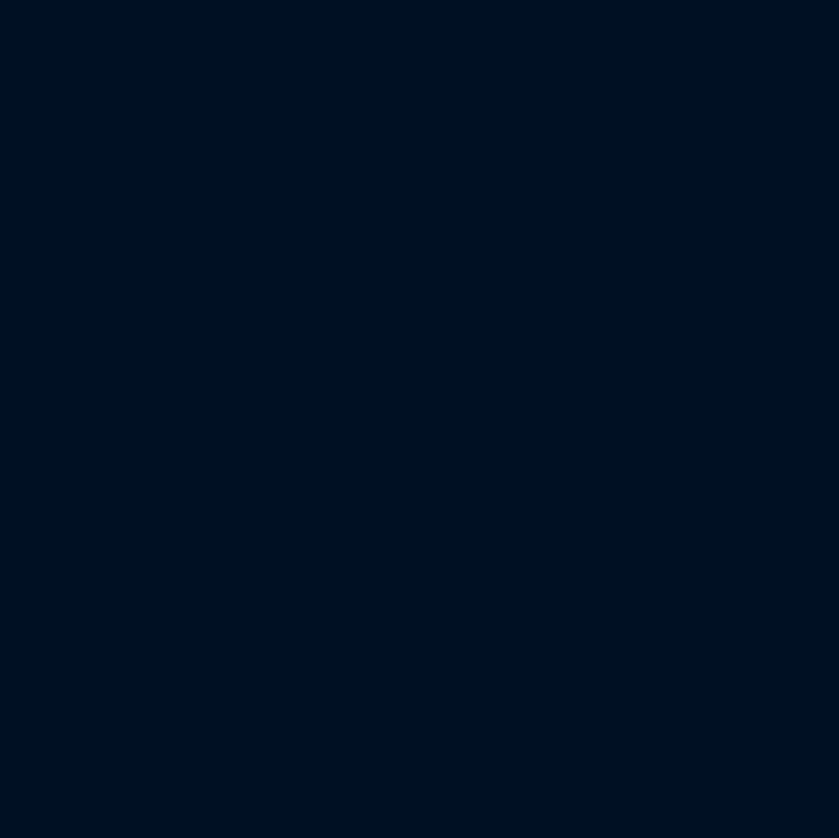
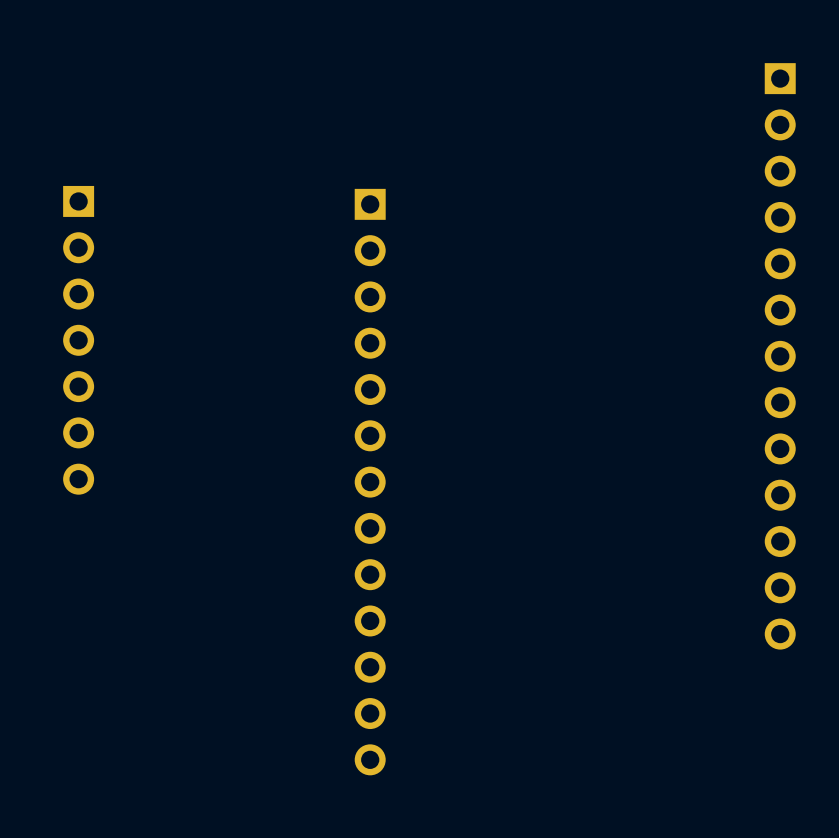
part: none -> (78, 340)
part: none -> (780, 356)
part: none -> (370, 482)

